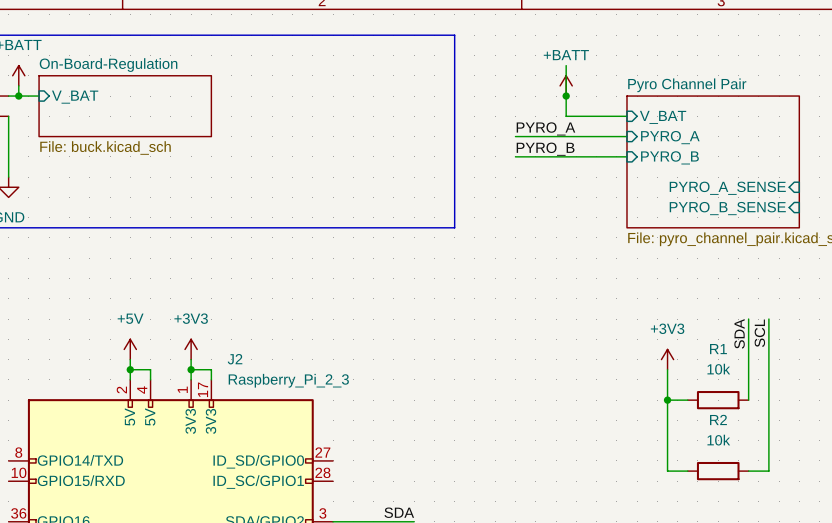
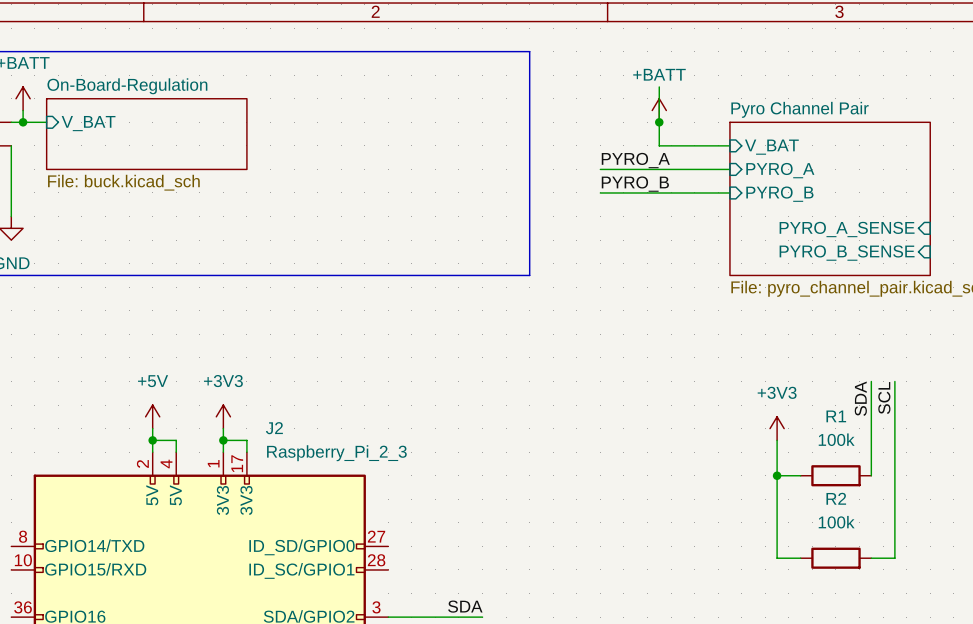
R1 value: 10k (718, 369) -> 100k (836, 439)
R2 value: 10k (718, 440) -> 100k (836, 522)

